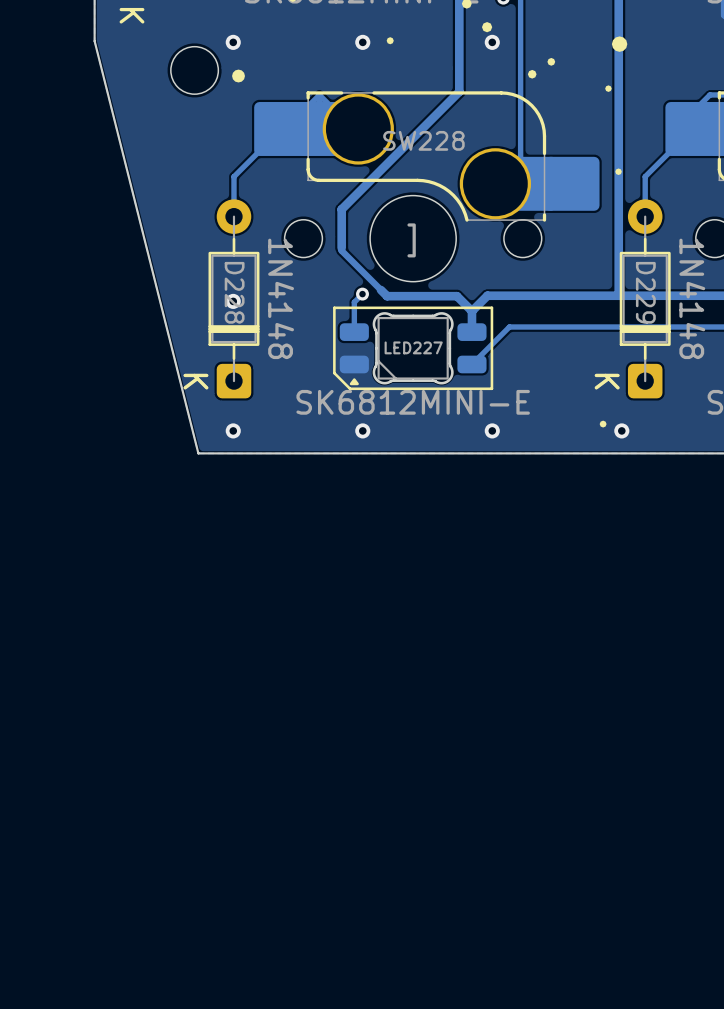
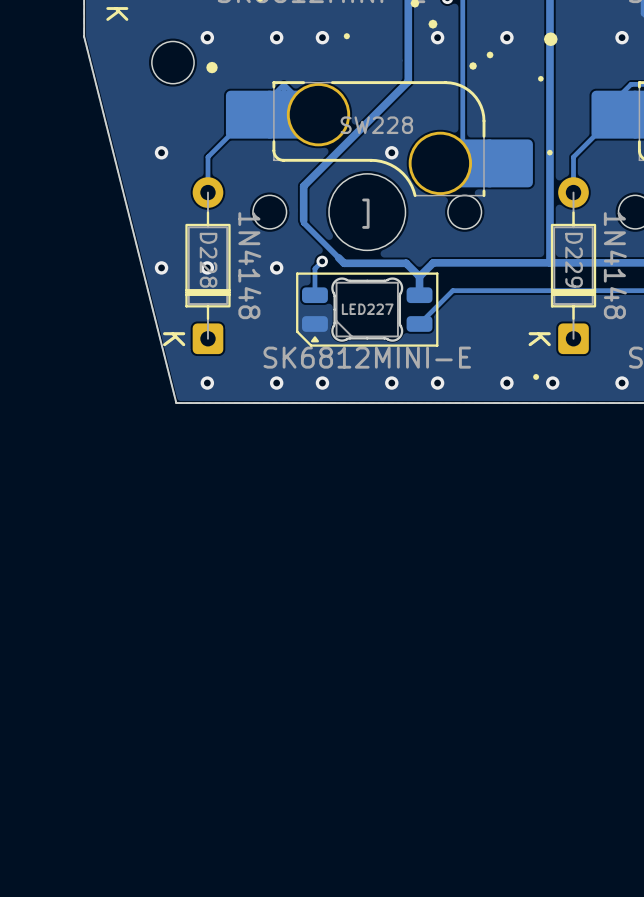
via: none -> (276, 37)
via: none -> (506, 37)
via: none -> (622, 37)
via: none -> (161, 152)
via: none -> (391, 152)
via: none -> (161, 267)
via: none -> (276, 267)
via: none -> (276, 383)
via: none -> (391, 383)
via: none -> (506, 383)
via: none -> (622, 383)

